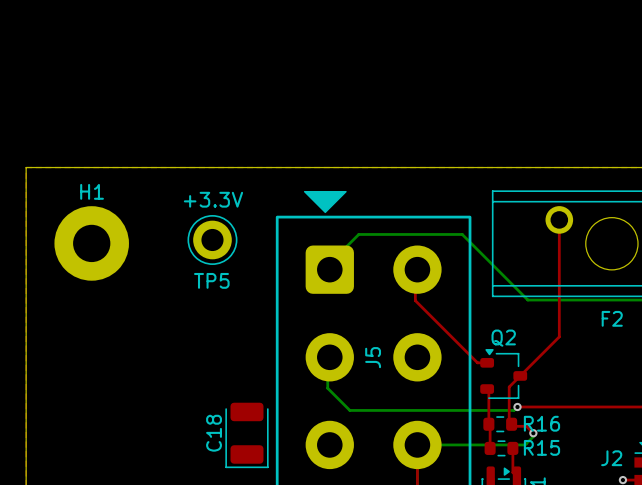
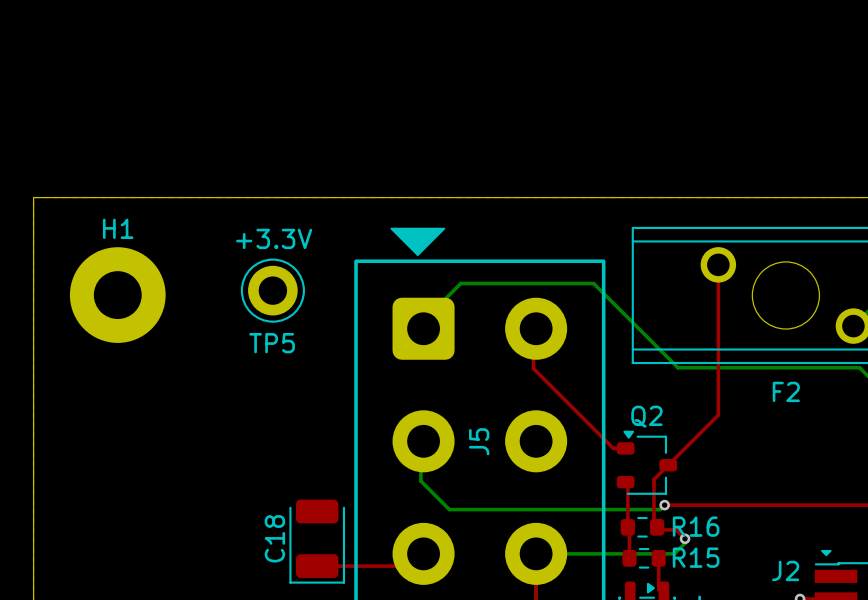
top track: none -> (423, 553) (411, 566) (317, 566)

